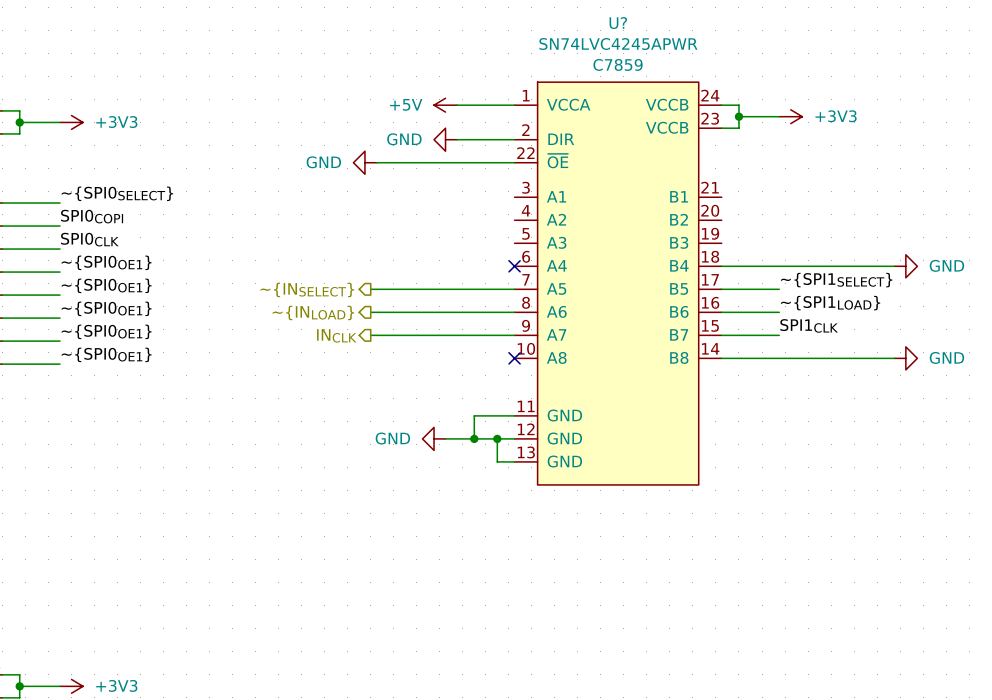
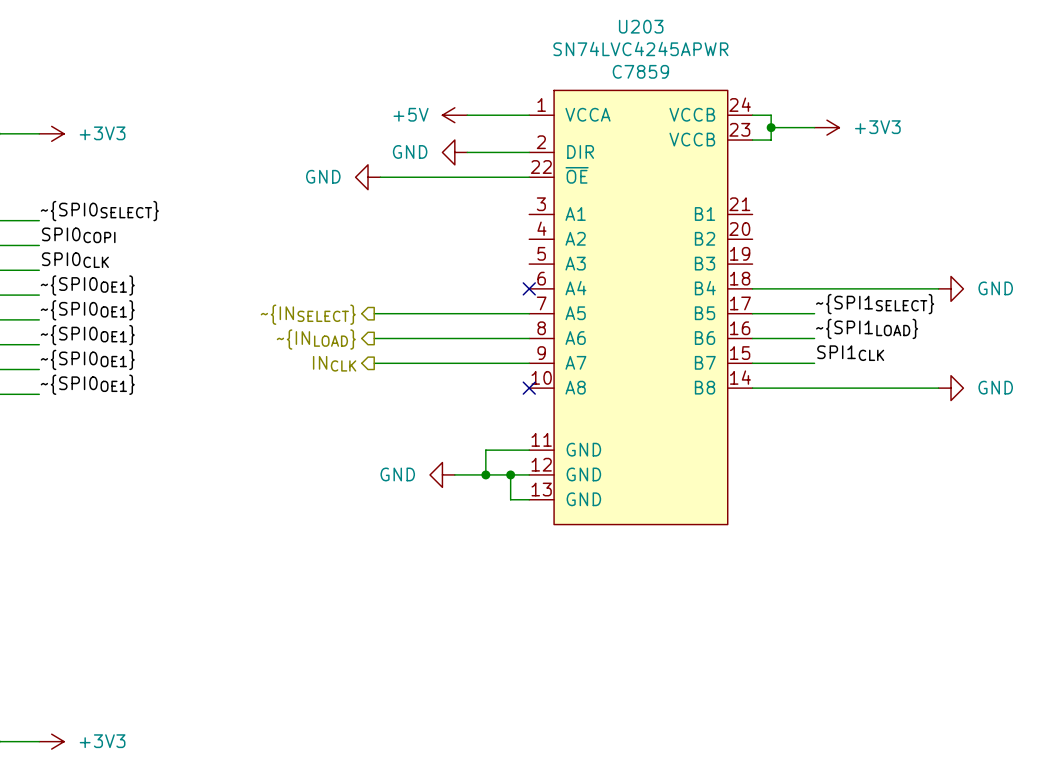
U? name: U? (618, 23) -> U203 (641, 26)

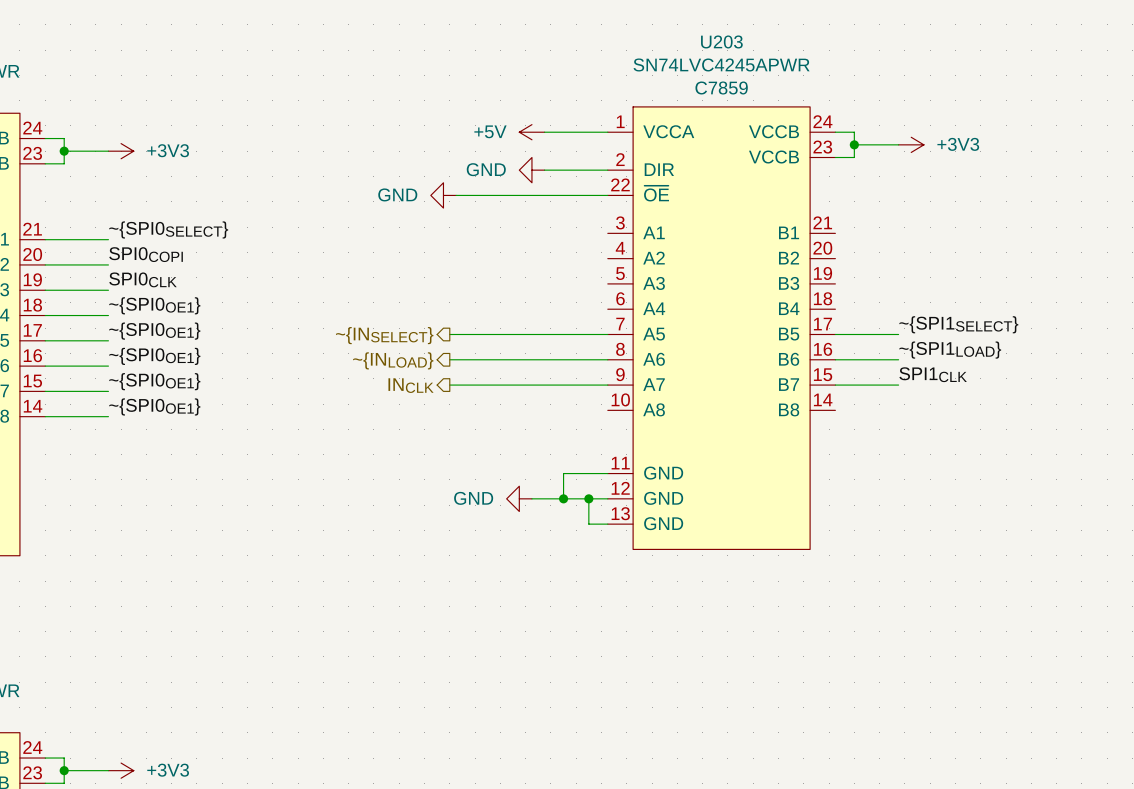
no-connect mark: (529, 288) -> none
wire: (752, 288) (938, 288) -> none
power symbol: GND (951, 288) -> none
no-connect mark: (529, 388) -> none
wire: (752, 388) (938, 388) -> none
power symbol: GND (951, 388) -> none

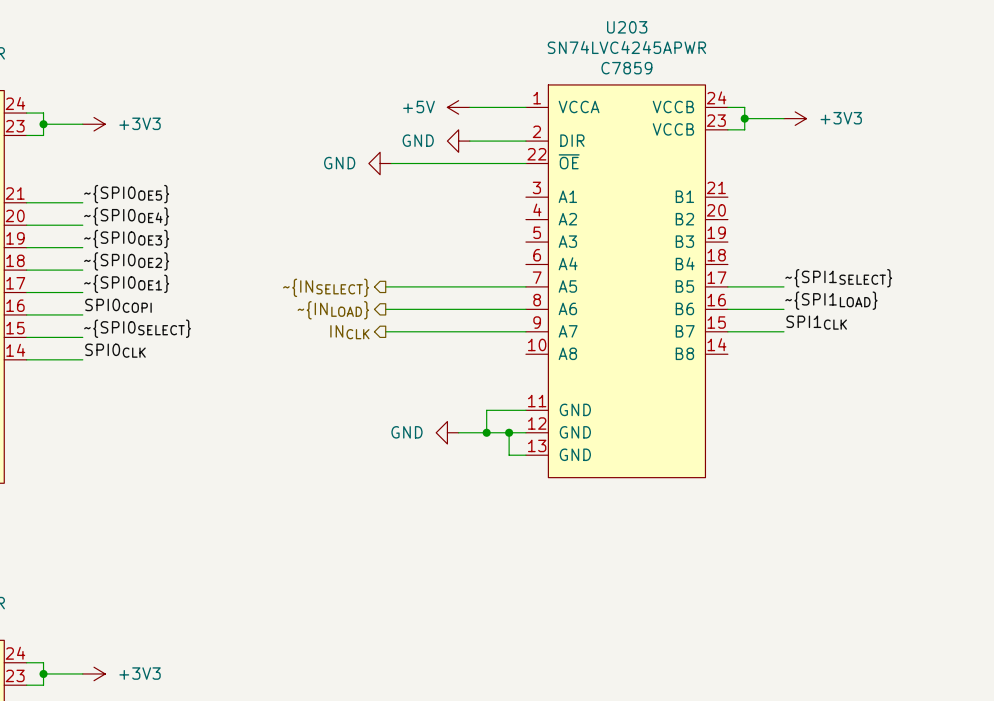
label: ~{SPI0SELECT} (168, 229) -> ~{SPI0OE5} (126, 194)
label: SPI0COPI (146, 254) -> ~{SPI0OE4} (126, 216)
label: SPI0CLK (143, 279) -> ~{SPI0OE3} (126, 238)
label: ~{SPI0OE1} (154, 305) -> ~{SPI0OE2} (126, 261)
label: ~{SPI0OE1} (154, 356) -> SPI0COPI (118, 305)
label: ~{SPI0OE1} (154, 381) -> ~{SPI0SELECT} (137, 328)
label: ~{SPI0OE1} (154, 406) -> SPI0CLK (115, 350)

